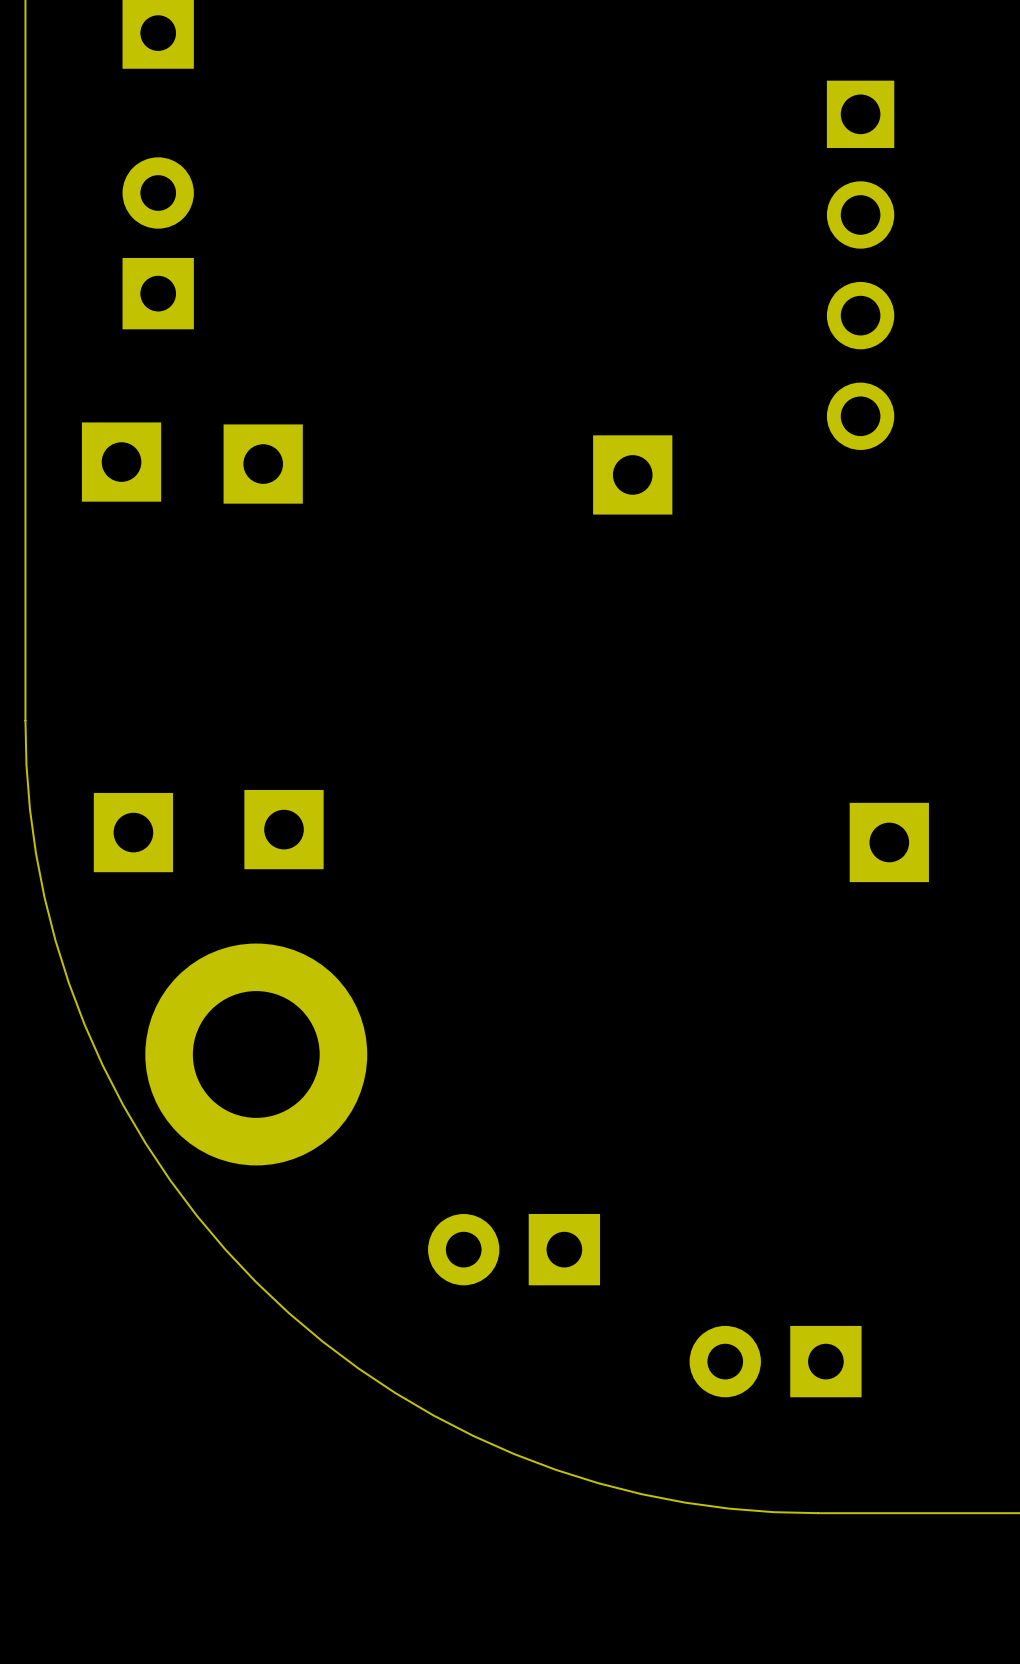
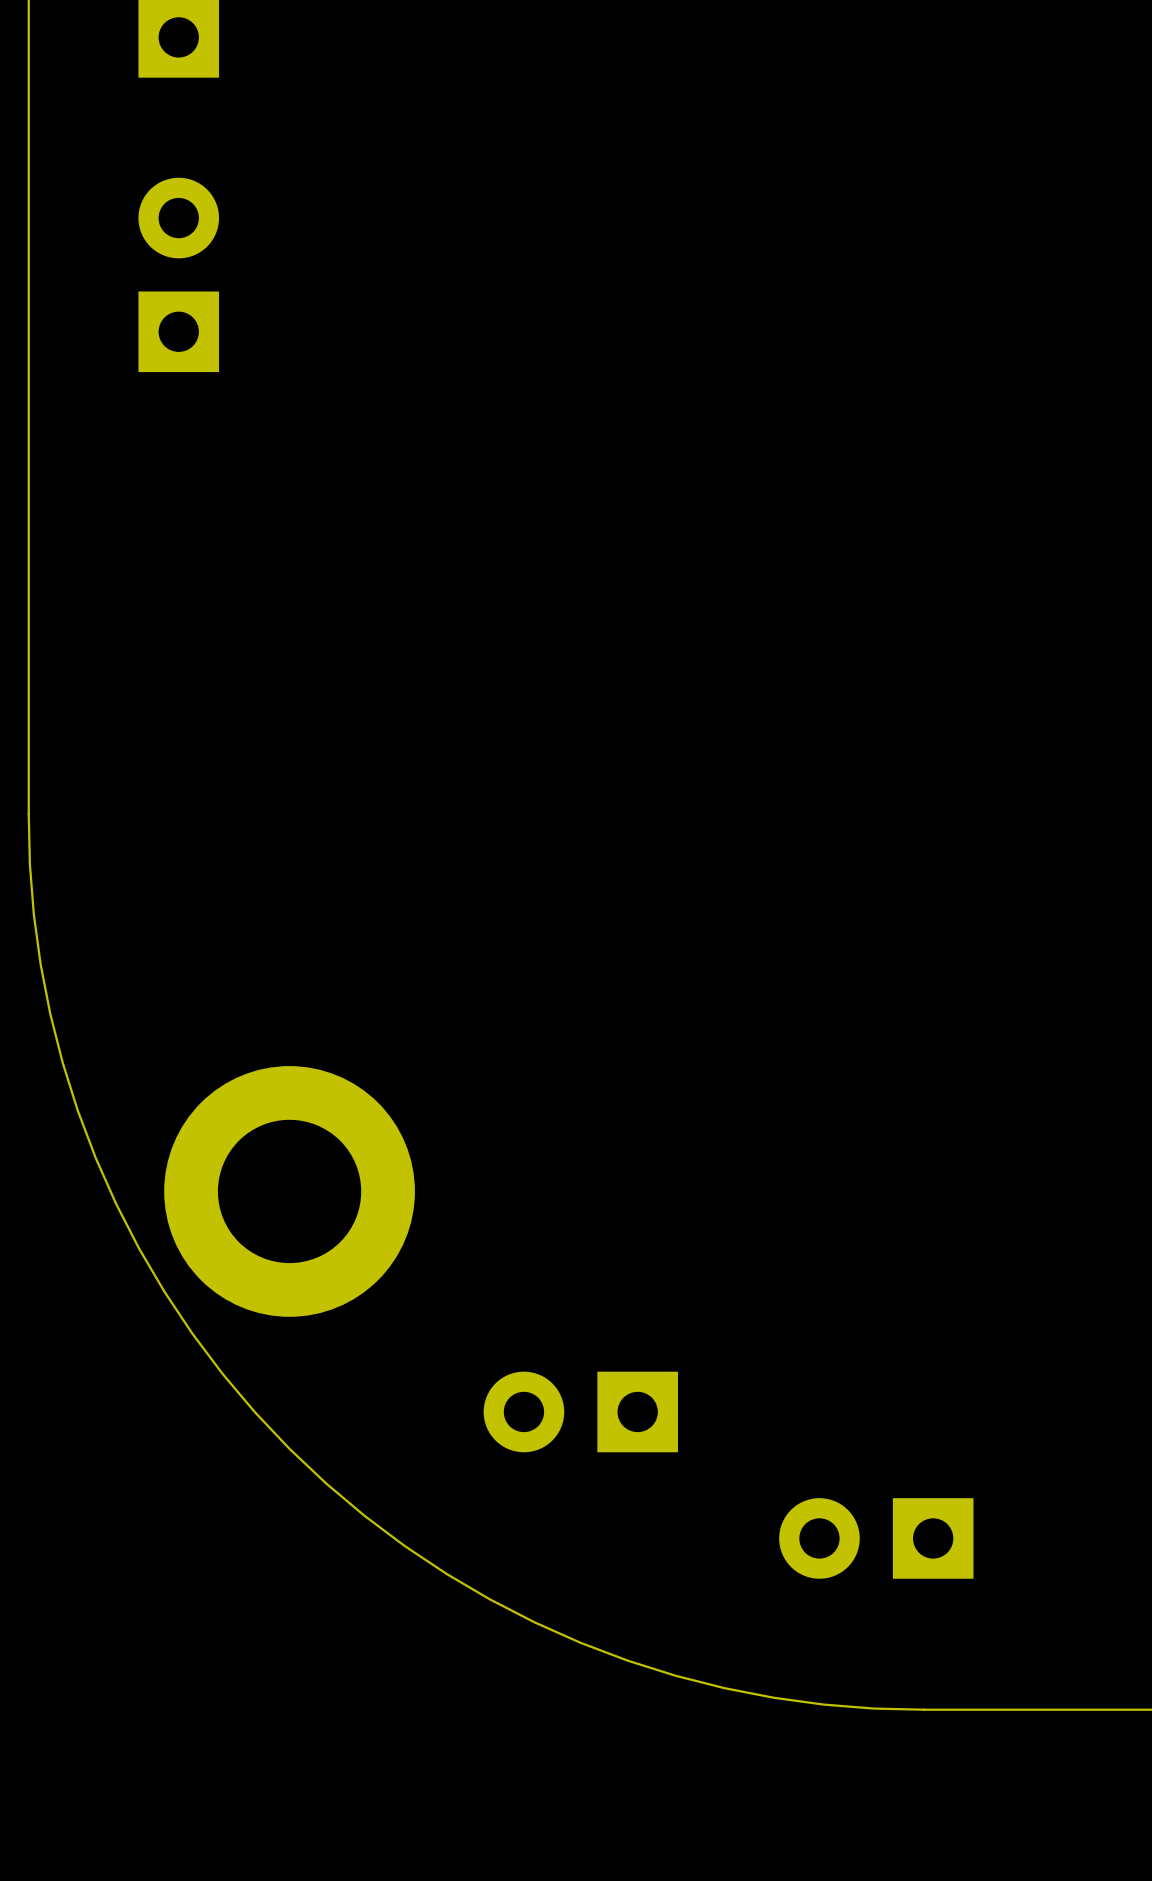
part: (860, 265) -> none
part: (121, 462) -> none
part: (263, 464) -> none
part: (632, 474) -> none
part: (284, 829) -> none
part: (133, 832) -> none
part: (889, 842) -> none

